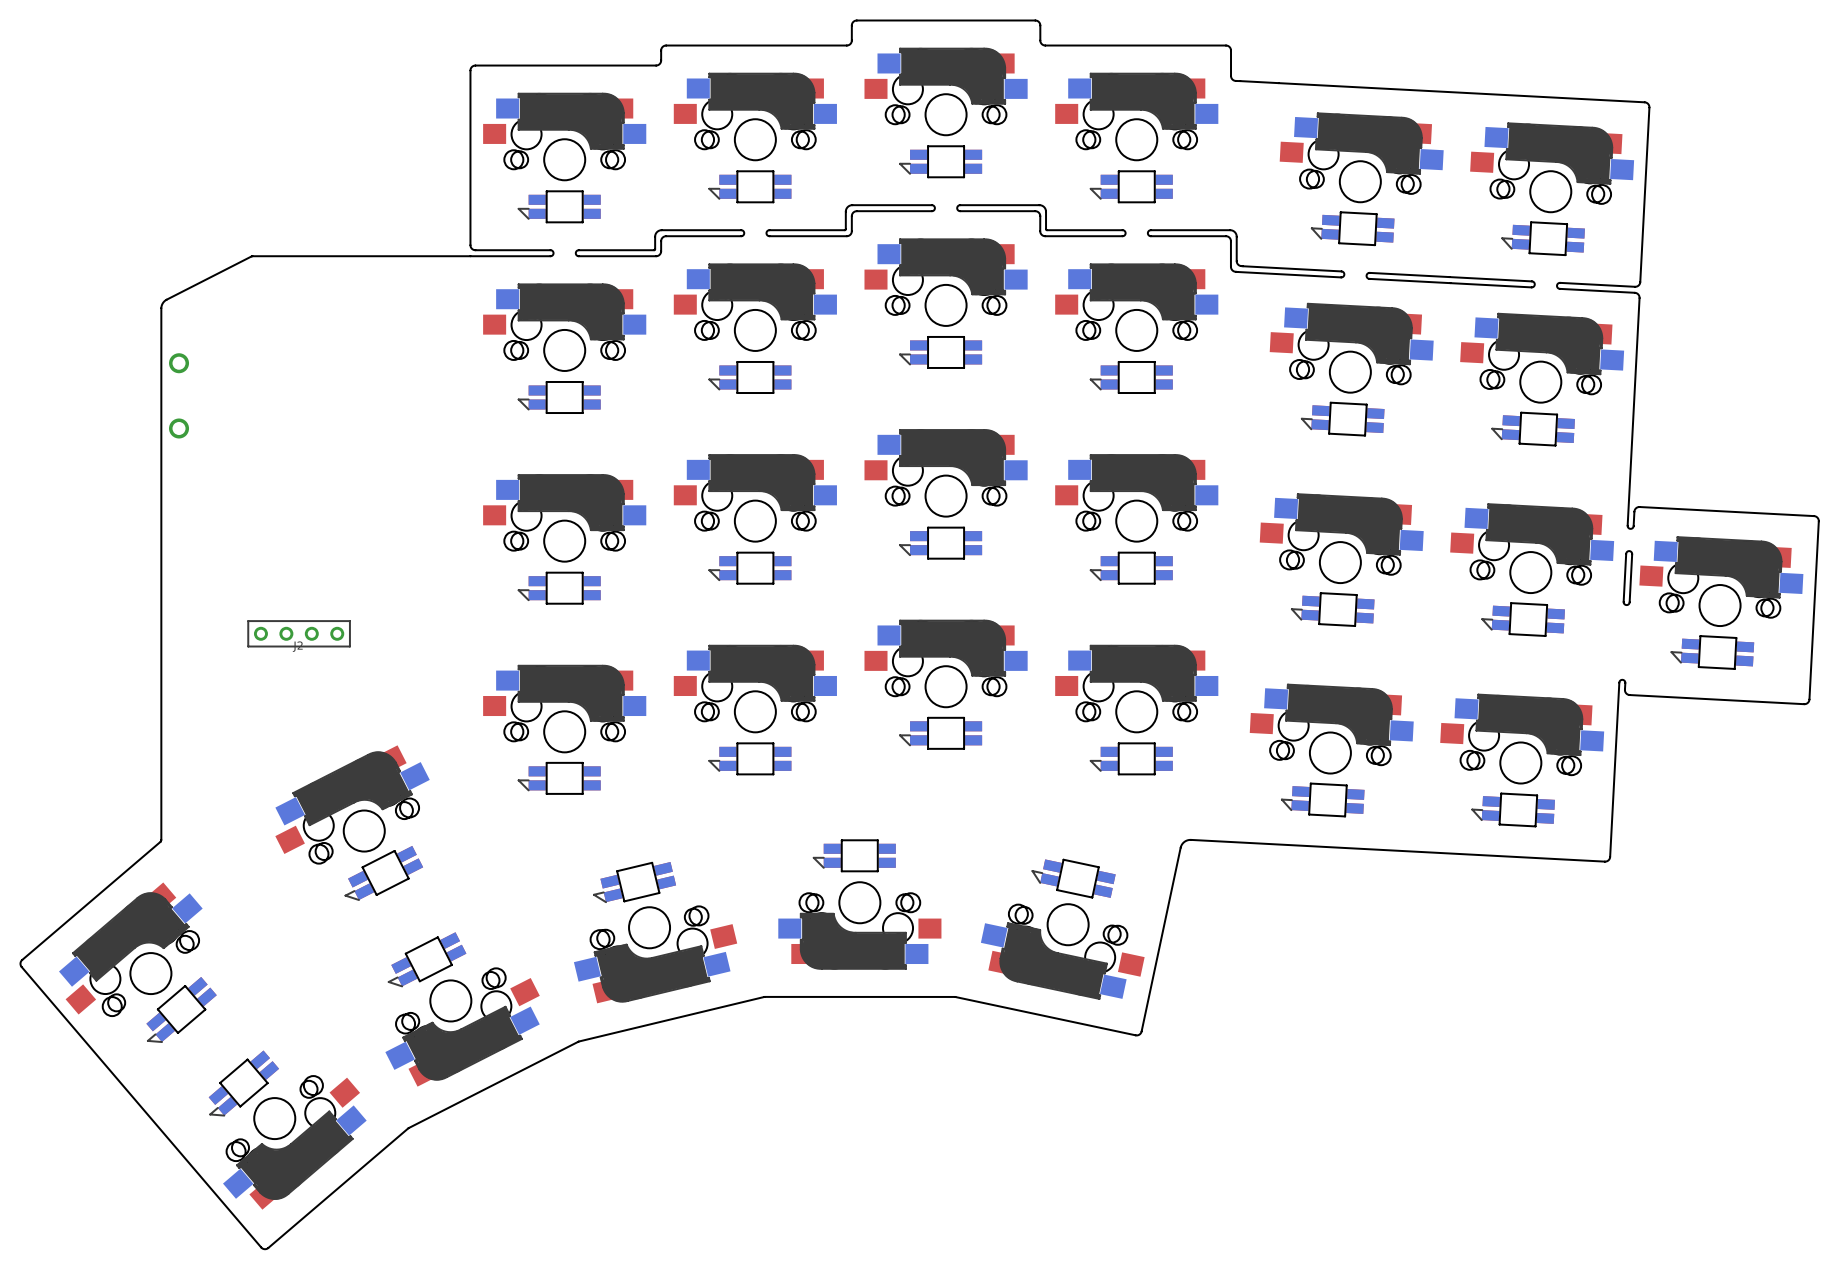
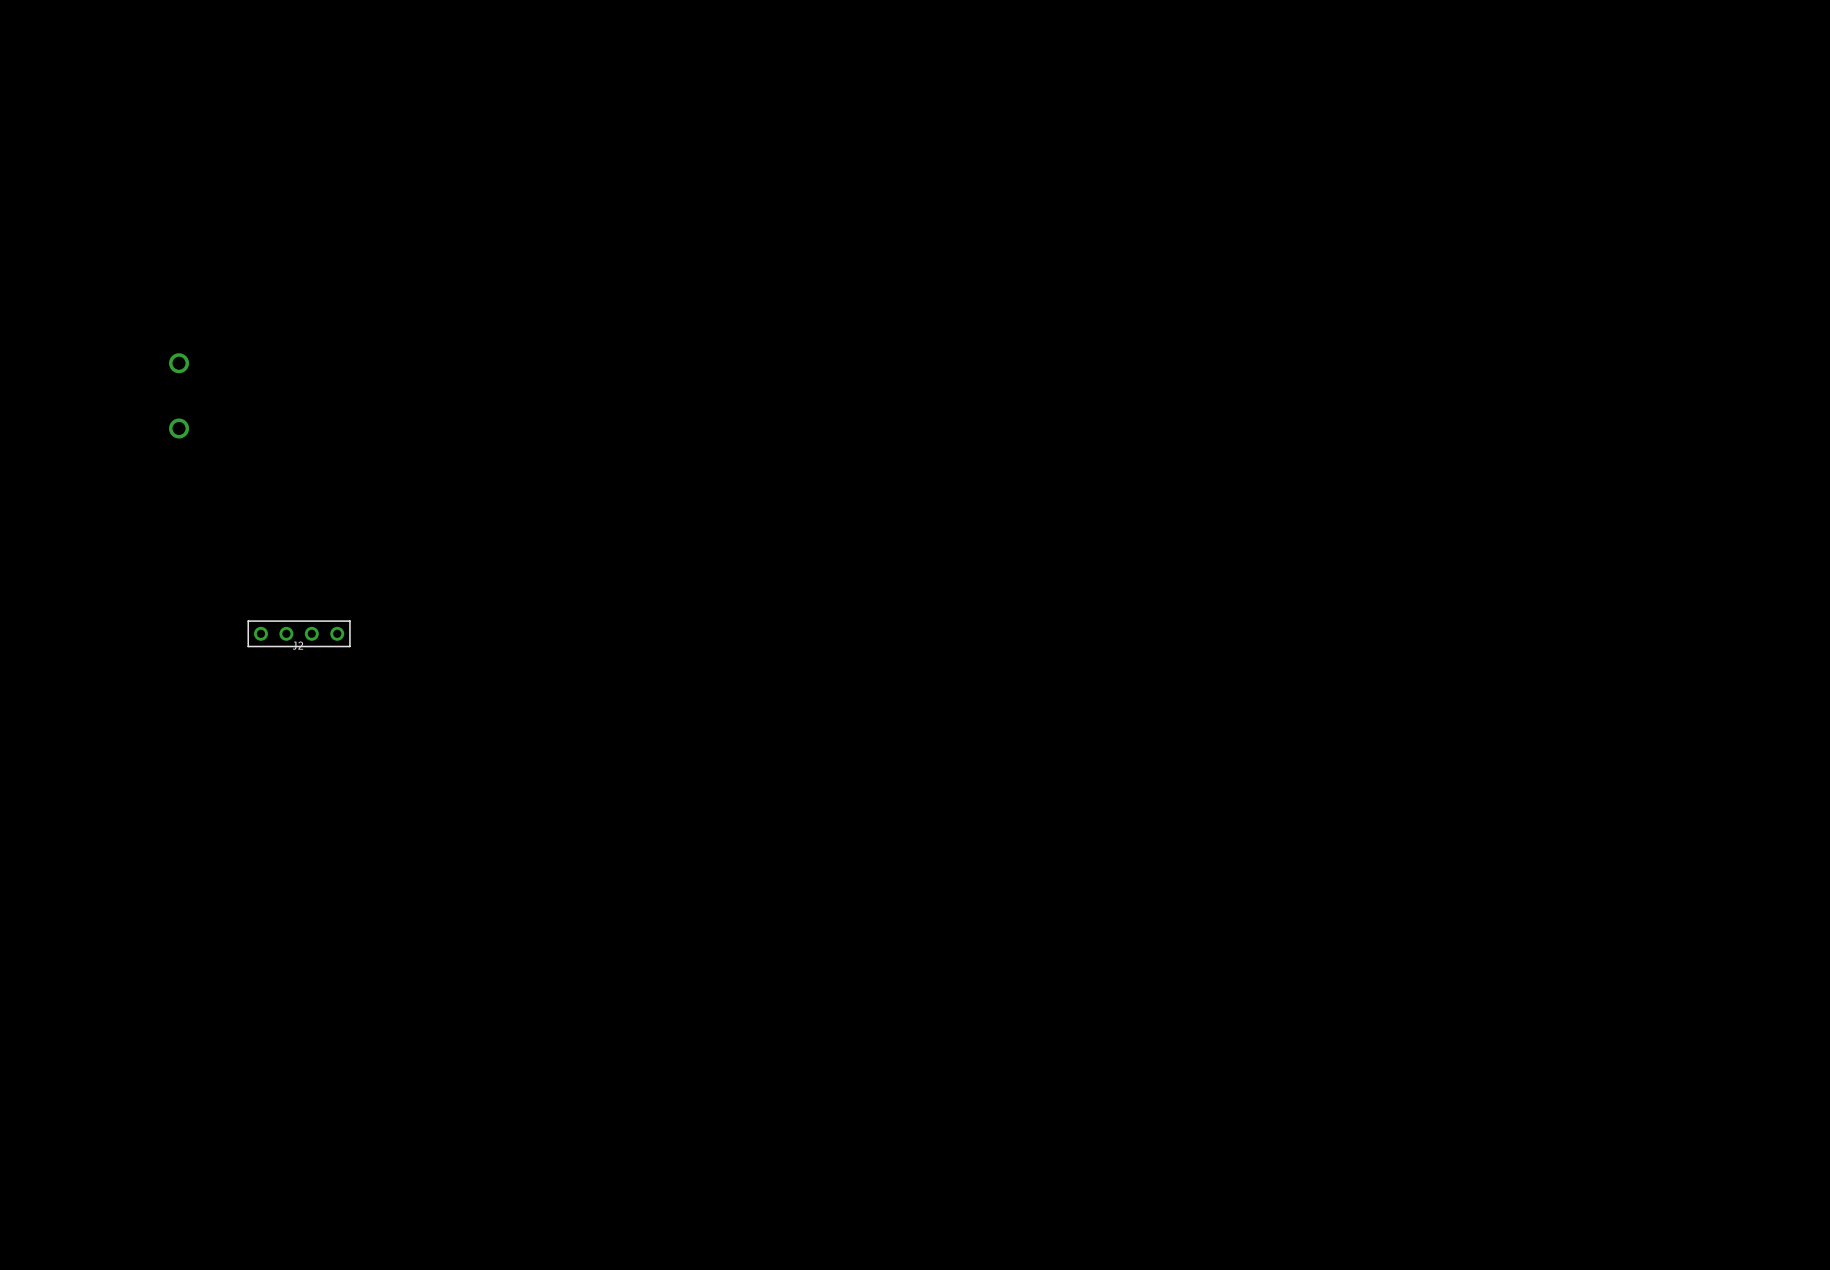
board edge: (1035, 20) (856, 20) (852, 23) (851, 41) (847, 45) (665, 45) (661, 48) (660, 61) (656, 65) (473, 65) (470, 70) (470, 247) (475, 250) (550, 250) (553, 252) (552, 255) (252, 256) (162, 303) (161, 308) (161, 840) (22, 959) (20, 964) (262, 1248) (268, 1248) (408, 1128) (578, 1041) (764, 996) (955, 996) (1138, 1035) (1141, 1031) (1180, 847) (1186, 840) (1606, 861) (1610, 856) (1620, 680) (1624, 681) (1625, 691) (1629, 695) (1804, 704) (1808, 701) (1818, 518) (1814, 516) (1639, 507) (1634, 510) (1633, 527) (1628, 528) (1639, 296) (1634, 292) (1559, 288) (1557, 286) (1559, 282) (1635, 286) (1639, 283) (1649, 107) (1647, 103) (1235, 80) (1231, 77) (1230, 49) (1227, 45) (1044, 45) (1040, 41) (1040, 23) (1035, 20) -> none
part: (946, 91) -> none
part: (755, 116) -> none
part: (1136, 116) -> none
part: (564, 136) -> none
part: (1361, 157) -> none
part: (940, 161) -> none
part: (1552, 167) -> none
part: (750, 186) -> none
part: (1131, 186) -> none
board edge: (931, 205) (851, 205) (846, 209) (845, 230) (769, 230) (766, 233) (769, 236) (847, 236) (851, 232) (851, 215) (855, 211) (932, 211) (934, 207) (931, 205) -> none
board edge: (1039, 205) (960, 205) (957, 208) (960, 211) (1036, 211) (1040, 215) (1040, 232) (1044, 236) (1122, 236) (1125, 234) (1122, 230) (1046, 230) (1045, 209) (1039, 205) -> none
part: (559, 206) -> none
part: (1352, 228) -> none
board edge: (741, 230) (660, 230) (655, 235) (654, 250) (578, 250) (575, 253) (578, 256) (656, 256) (660, 253) (661, 239) (664, 236) (741, 236) (744, 232) (741, 230) -> none
board edge: (1230, 230) (1150, 230) (1147, 233) (1150, 236) (1227, 236) (1230, 240) (1231, 267) (1234, 271) (1341, 277) (1344, 275) (1341, 271) (1239, 265) (1236, 261) (1236, 235) (1230, 230) -> none
part: (1543, 238) -> none
board edge: (1369, 272) (1531, 281) (1534, 284) (1531, 287) (1369, 278) (1366, 275) (1369, 272) -> none
part: (946, 282) -> none
part: (755, 307) -> none
part: (1136, 307) -> none
part: (564, 327) -> none
part: (1351, 347) -> none
part: (940, 352) -> none
part: (1542, 357) -> none
part: (750, 377) -> none
part: (1131, 377) -> none
part: (559, 397) -> none
part: (1342, 419) -> none
part: (1533, 429) -> none
part: (946, 472) -> none
part: (755, 497) -> none
part: (1136, 497) -> none
part: (564, 518) -> none
part: (1341, 538) -> none
part: (940, 543) -> none
part: (1532, 548) -> none
board edge: (1626, 553) (1623, 602) (1626, 605) (1629, 602) (1632, 553) (1628, 551) (1626, 553) -> none
part: (750, 568) -> none
part: (1131, 568) -> none
part: (1721, 581) -> none
part: (559, 588) -> none
part: (1332, 609) -> none
part: (1523, 619) -> none
part: (1712, 652) -> none
part: (946, 663) -> none
part: (755, 688) -> none
part: (1136, 688) -> none
part: (564, 708) -> none
part: (1331, 728) -> none
part: (940, 733) -> none
part: (1522, 738) -> none
part: (750, 758) -> none
part: (1131, 758) -> none
part: (559, 778) -> none
part: (1322, 800) -> none
part: (352, 804) -> none
part: (1513, 809) -> none
part: (854, 855) -> none
part: (384, 873) -> none
part: (1073, 878) -> none
part: (634, 882) -> none
part: (859, 925) -> none
part: (130, 949) -> none
part: (1062, 951) -> none
part: (655, 954) -> none
part: (427, 959) -> none
part: (181, 1009) -> none
part: (462, 1027) -> none
part: (243, 1083) -> none
part: (294, 1142) -> none

